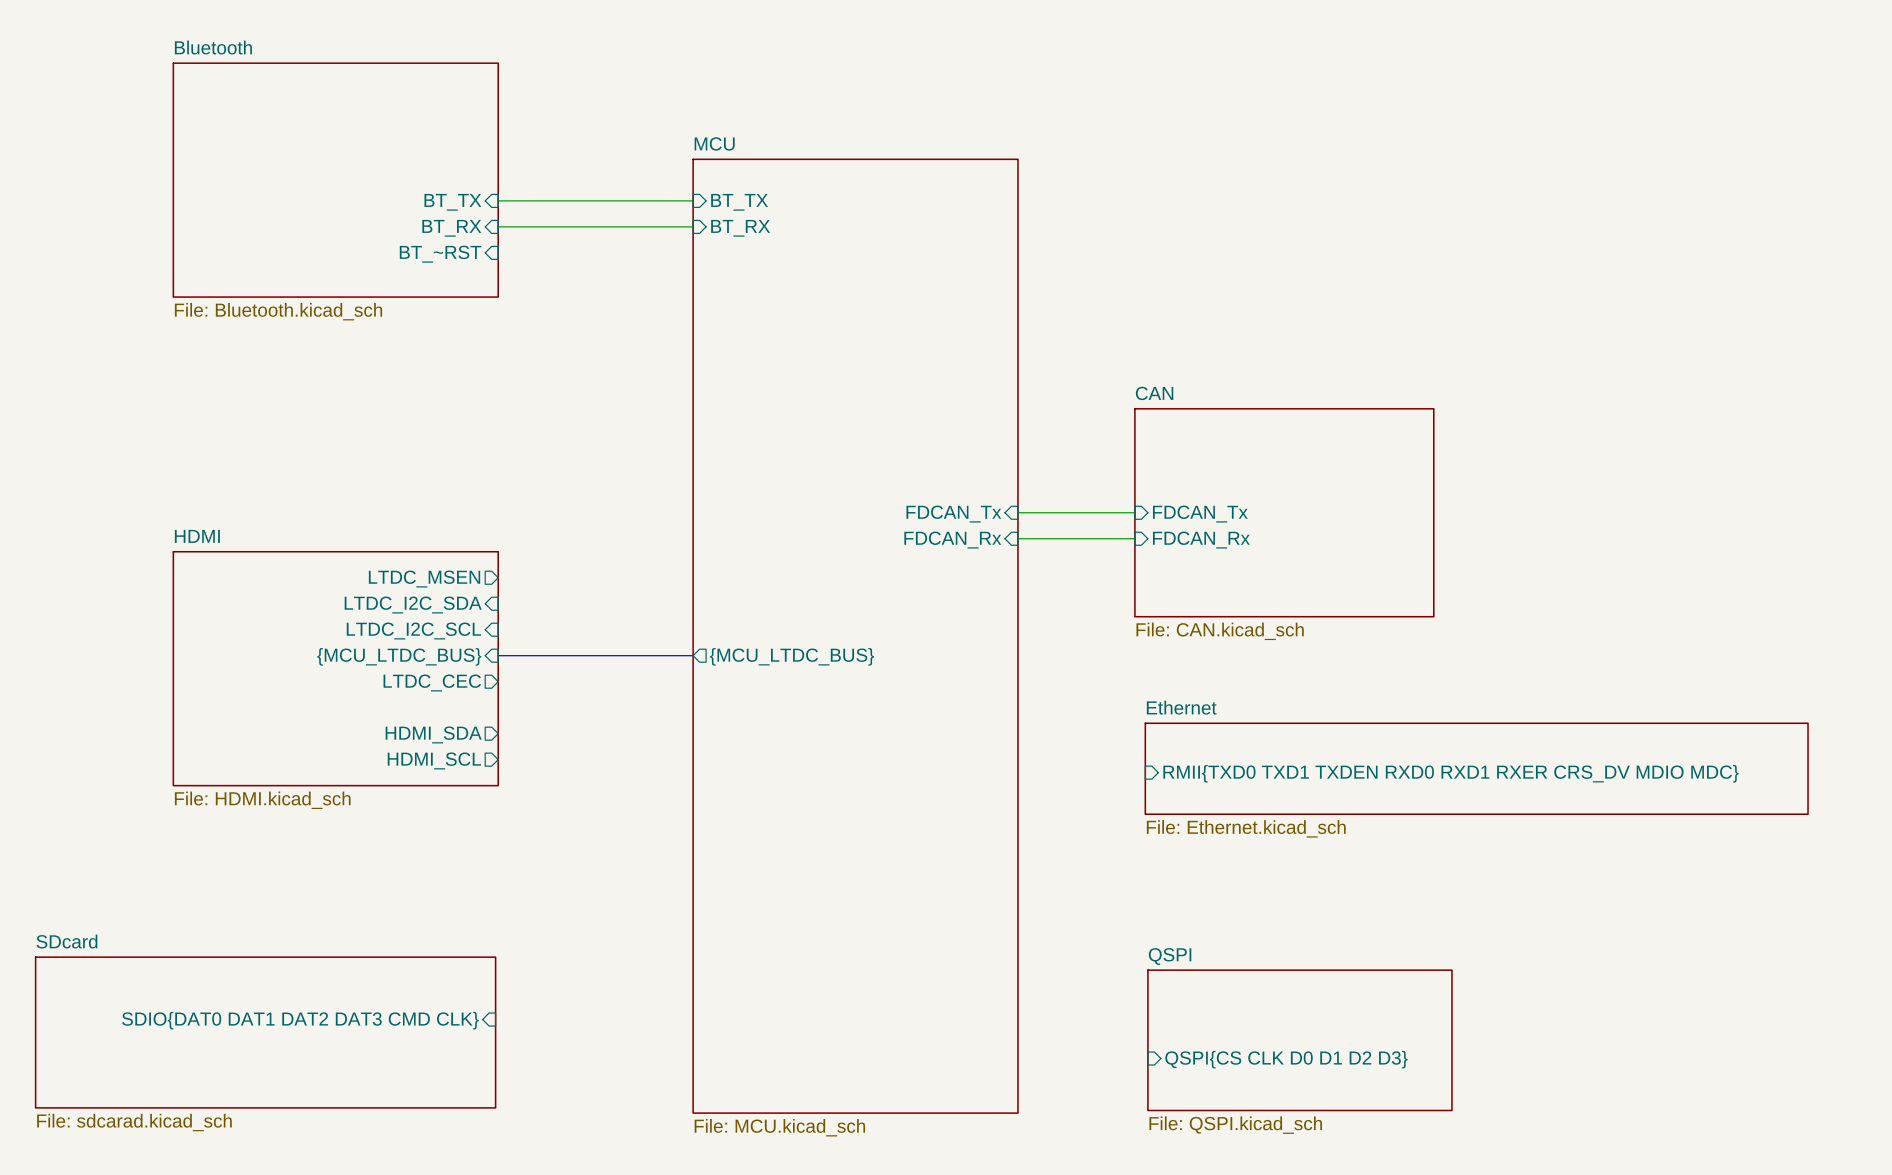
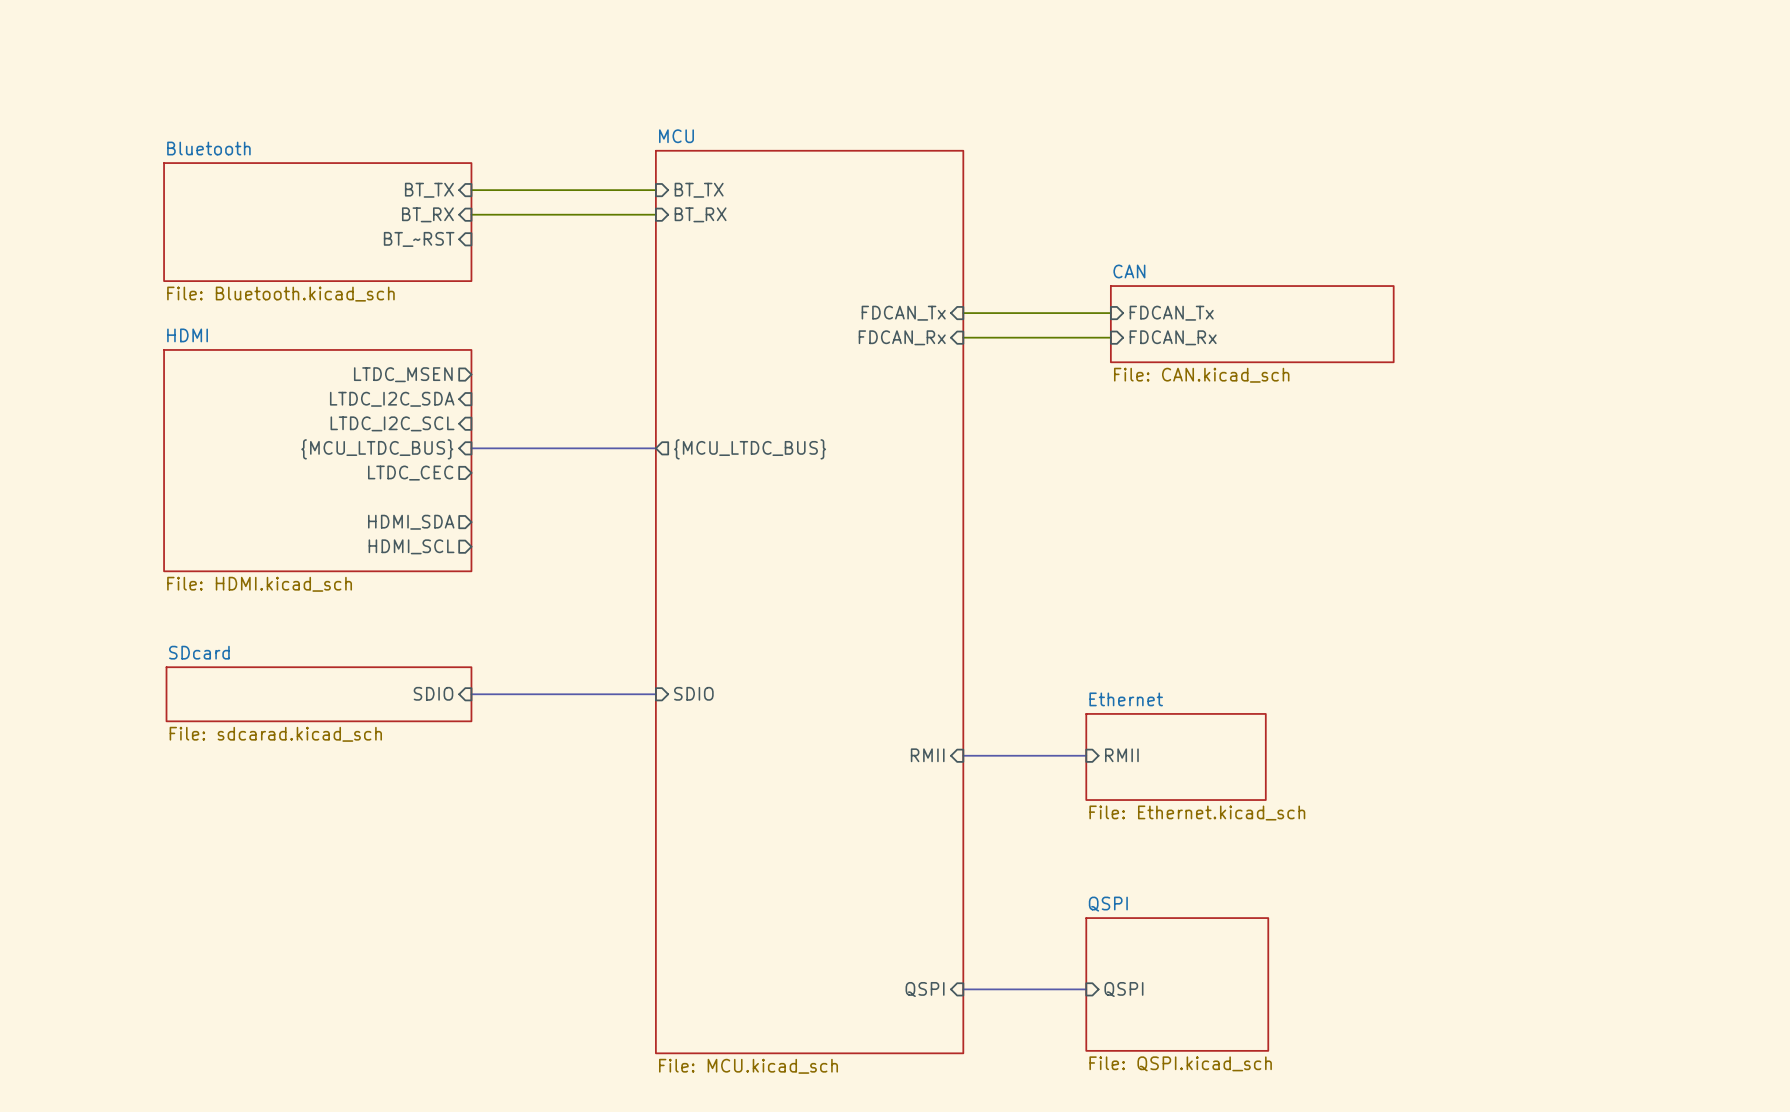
sheet Bluetooth: File: Bluetooth.kicad_sch (335, 180) -> none
sheet Bluetooth: none -> File: Bluetooth.kicad_sch (317, 222)
wire: none -> (963, 313) (1110, 313)
sheet pin: none -> FDCAN_Tx (903, 313)
sheet pin: none -> FDCAN_Tx (1171, 313)
sheet CAN: none -> File: CAN.kicad_sch (1252, 324)
wire: none -> (963, 337) (1110, 337)
sheet pin: none -> FDCAN_Rx (902, 337)
sheet pin: none -> FDCAN_Rx (1173, 337)
sheet pin: none -> LTDC_MSEN (403, 374)
bus: none -> (471, 448) (655, 448)
sheet pin: none -> {MCU_LTDC_BUS} (377, 449)
sheet pin: none -> {MCU_LTDC_BUS} (750, 449)
wire: (1017, 512) (1134, 512) -> none
sheet CAN: File: CAN.kicad_sch (1284, 512) -> none
sheet pin: FDCAN_Tx (953, 514) -> none
sheet pin: FDCAN_Tx (1200, 514) -> none
wire: (1017, 538) (1134, 538) -> none
sheet pin: FDCAN_Rx (952, 540) -> none
sheet pin: FDCAN_Rx (1201, 540) -> none
sheet pin: none -> HDMI_SDA (411, 522)
sheet pin: LTDC_MSEN (424, 579) -> HDMI_SCL (411, 546)
sheet pin position: LTDC_I2C_SDA (413, 605) -> LTDC_I2C_SDA (392, 399)
sheet pin position: LTDC_I2C_SCL (413, 631) -> LTDC_I2C_SCL (392, 423)
bus: (498, 655) (693, 655) -> (471, 694) (655, 694)
sheet pin: {MCU_LTDC_BUS} (399, 656) -> none
sheet pin: {MCU_LTDC_BUS} (792, 656) -> none
sheet HDMI position: (335, 668) -> (317, 460)
sheet pin position: LTDC_CEC (432, 682) -> LTDC_CEC (410, 473)
sheet SDcard: none -> File: sdcarad.kicad_sch (318, 694)
sheet pin: none -> SDIO (693, 693)
sheet pin shape: output (433, 734) -> input (433, 693)
sheet pin: HDMI_SDA (433, 734) -> SDIO (433, 693)
sheet pin: HDMI_SCL (434, 760) -> none
sheet Ethernet: File: Ethernet.kicad_sch (1476, 768) -> none
sheet pin: RMII{TXD0 TXD1 TXDEN RXD0 RXD1 RXER CRS_DV MDIO MDC} (1451, 773) -> none
sheet pin: none -> RMII (927, 755)
bus: none -> (963, 755) (1086, 755)
sheet pin: none -> RMII (1121, 755)
sheet Ethernet: none -> File: Ethernet.kicad_sch (1176, 756)
sheet pin: SDIO{DAT0 DAT1 DAT2 DAT3 CMD CLK} (300, 1020) -> none
sheet SDcard: File: sdcarad.kicad_sch (265, 1032) -> none
sheet QSPI: none -> File: QSPI.kicad_sch (1177, 984)
sheet QSPI: File: QSPI.kicad_sch (1299, 1040) -> none
bus: none -> (963, 989) (1086, 989)
sheet pin: none -> QSPI (925, 989)
sheet pin: none -> QSPI (1123, 989)
sheet pin: QSPI{CS CLK D0 D1 D2 D3} (1286, 1059) -> none

